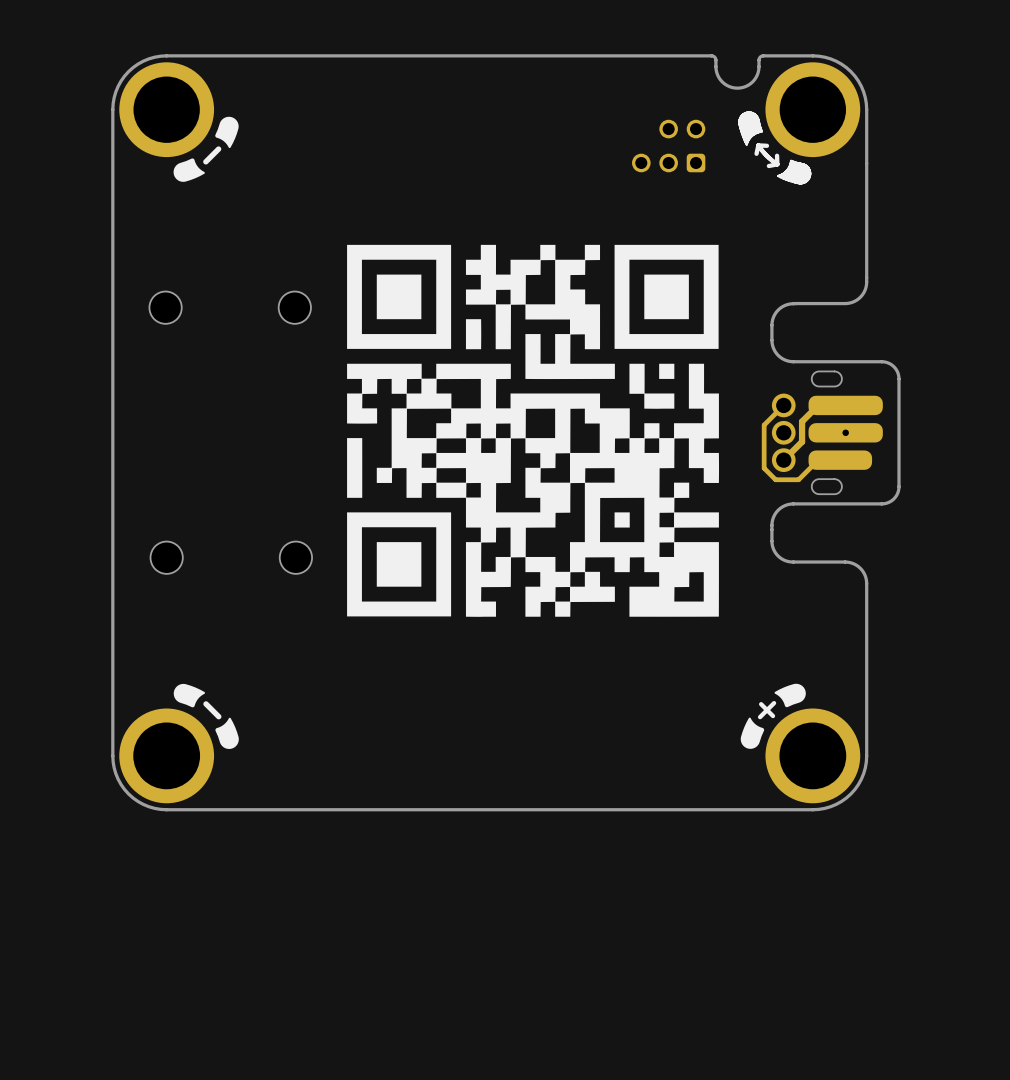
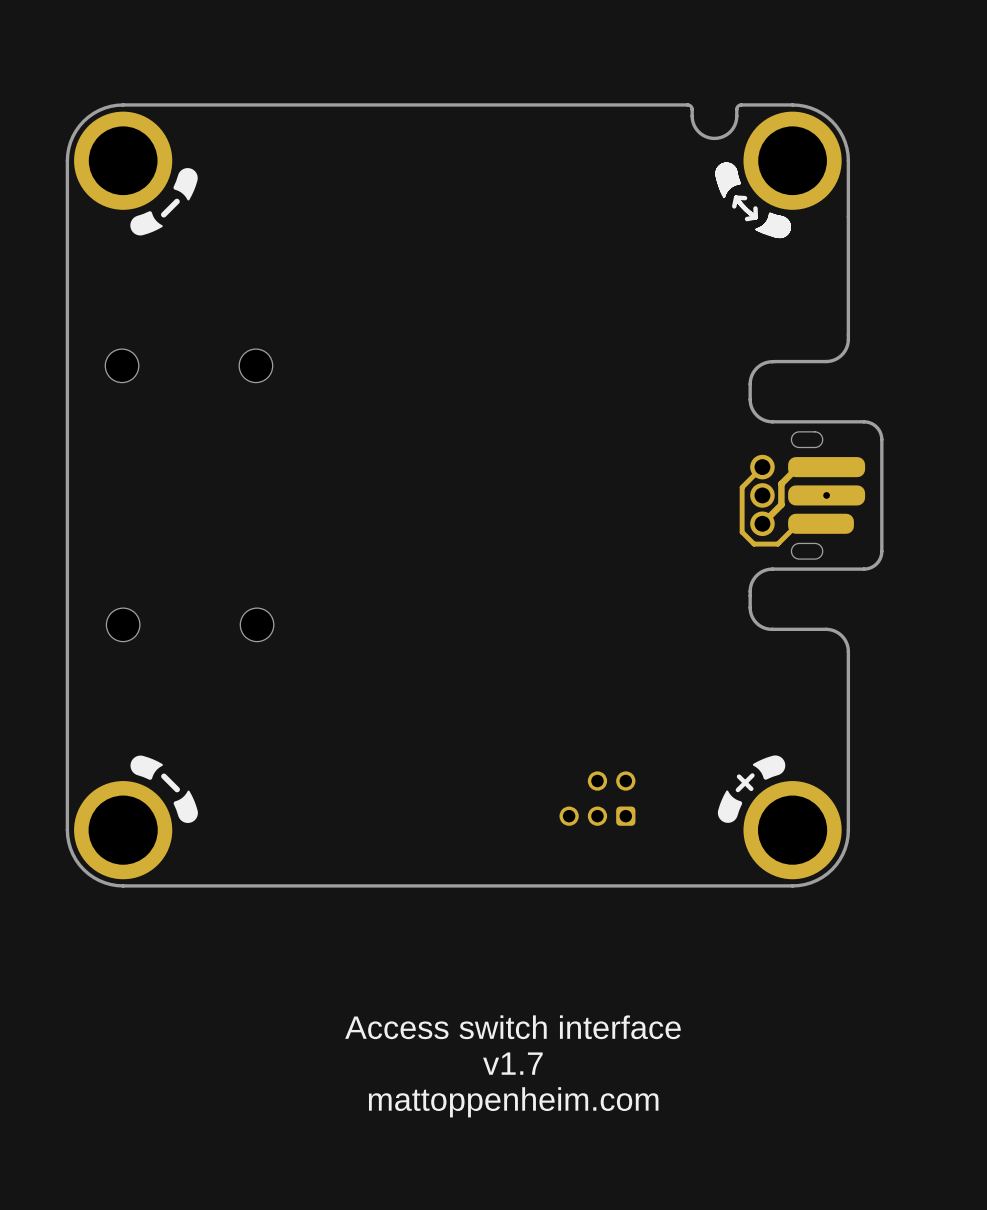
part: (668, 146) -> none
drawing: [347, 244, 720, 617] -> none
part: none -> (597, 798)
text: none -> Access switch interface (512, 1027)
text: none -> v1.7 (512, 1063)
text: none -> mattoppenheim.com (513, 1102)

